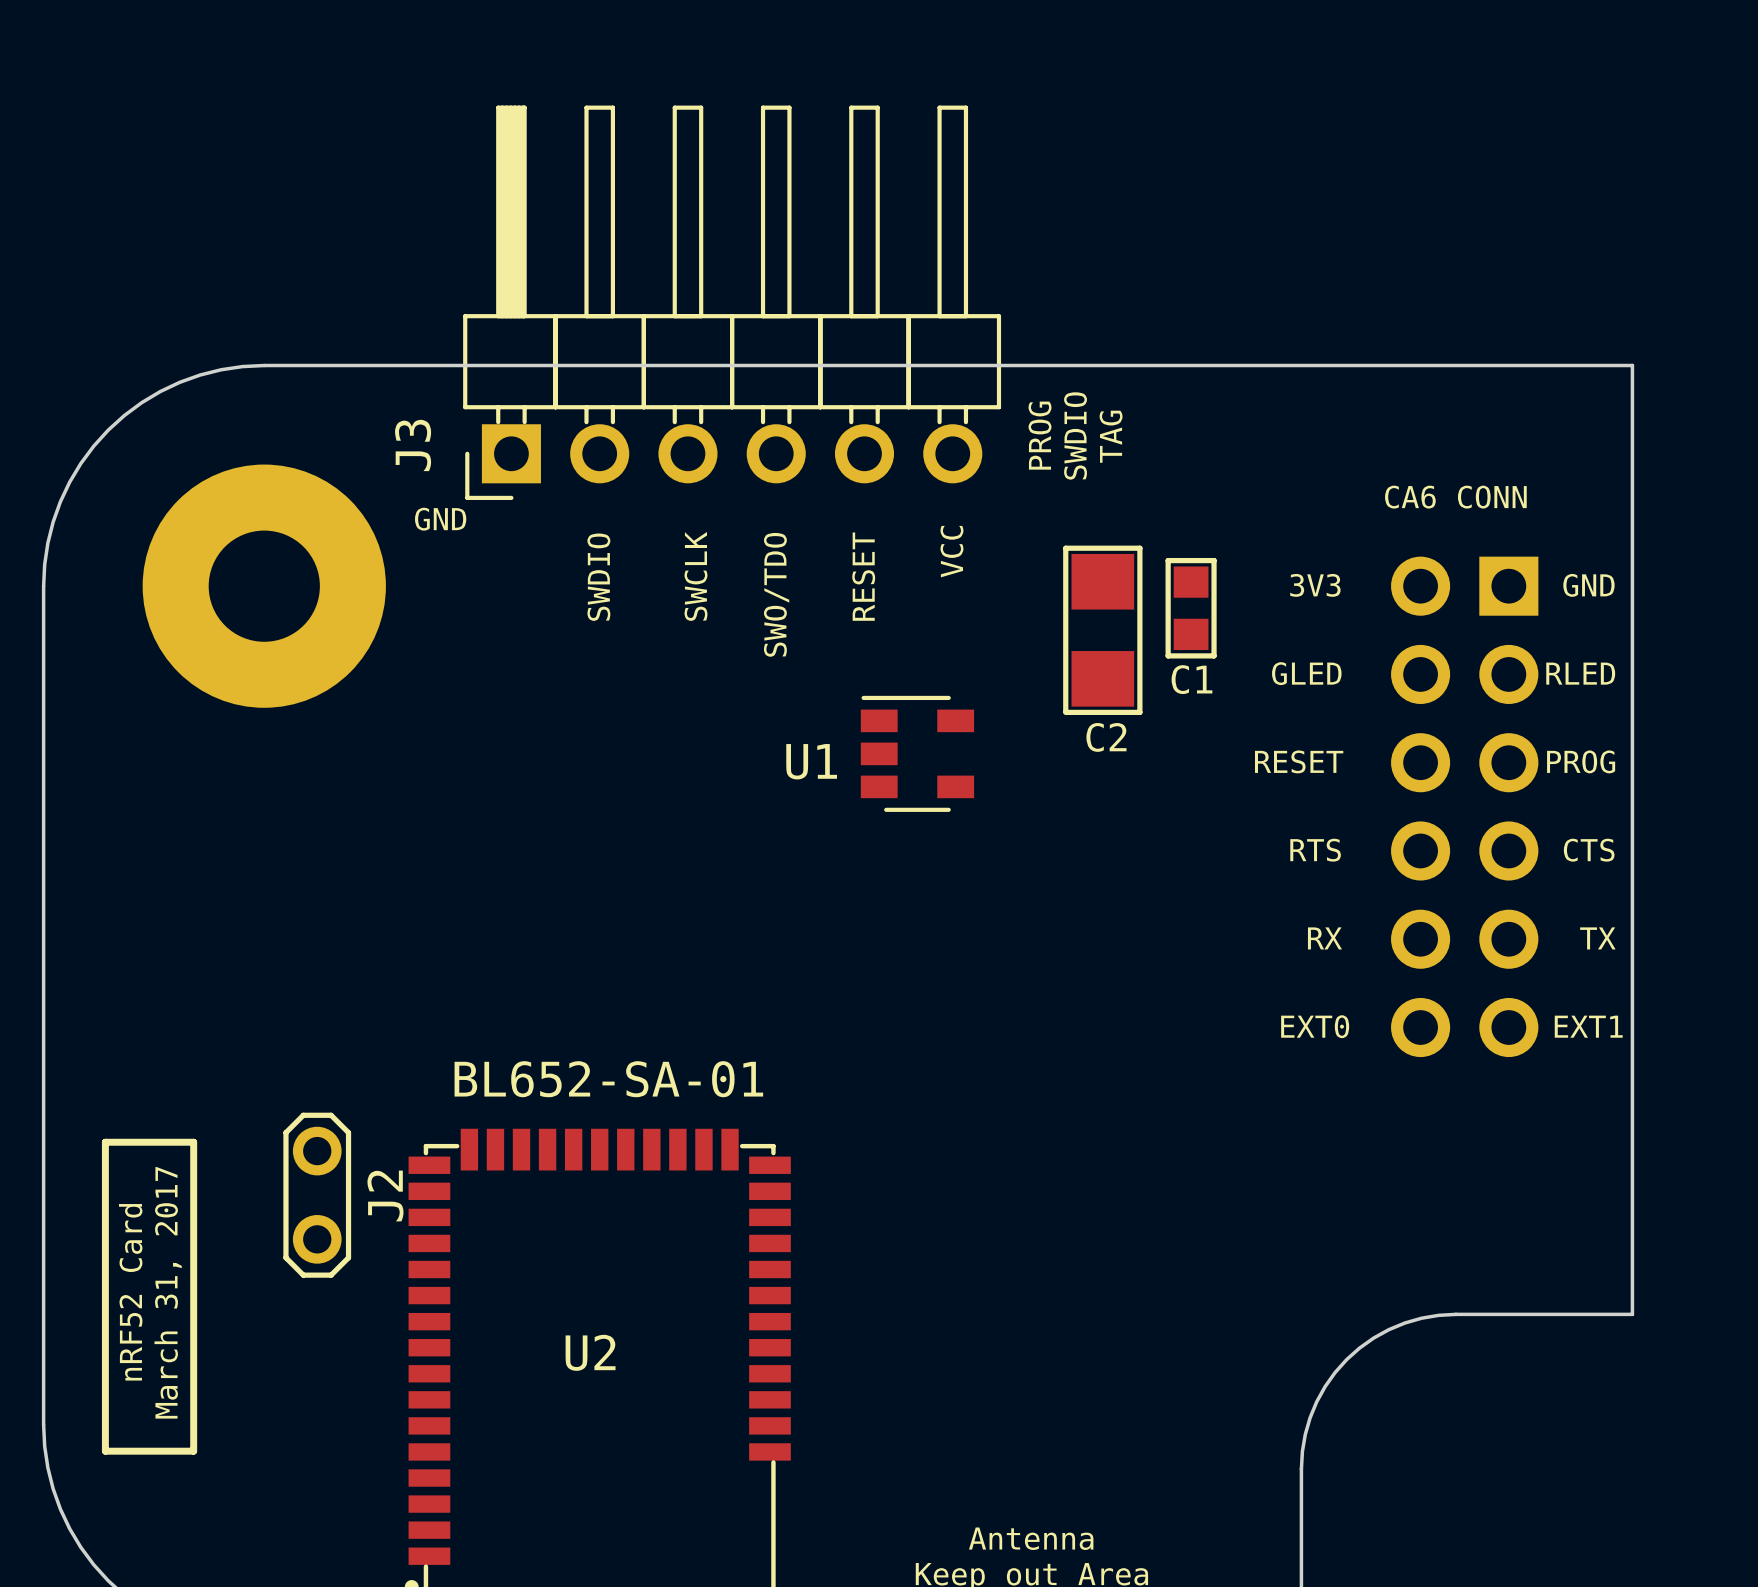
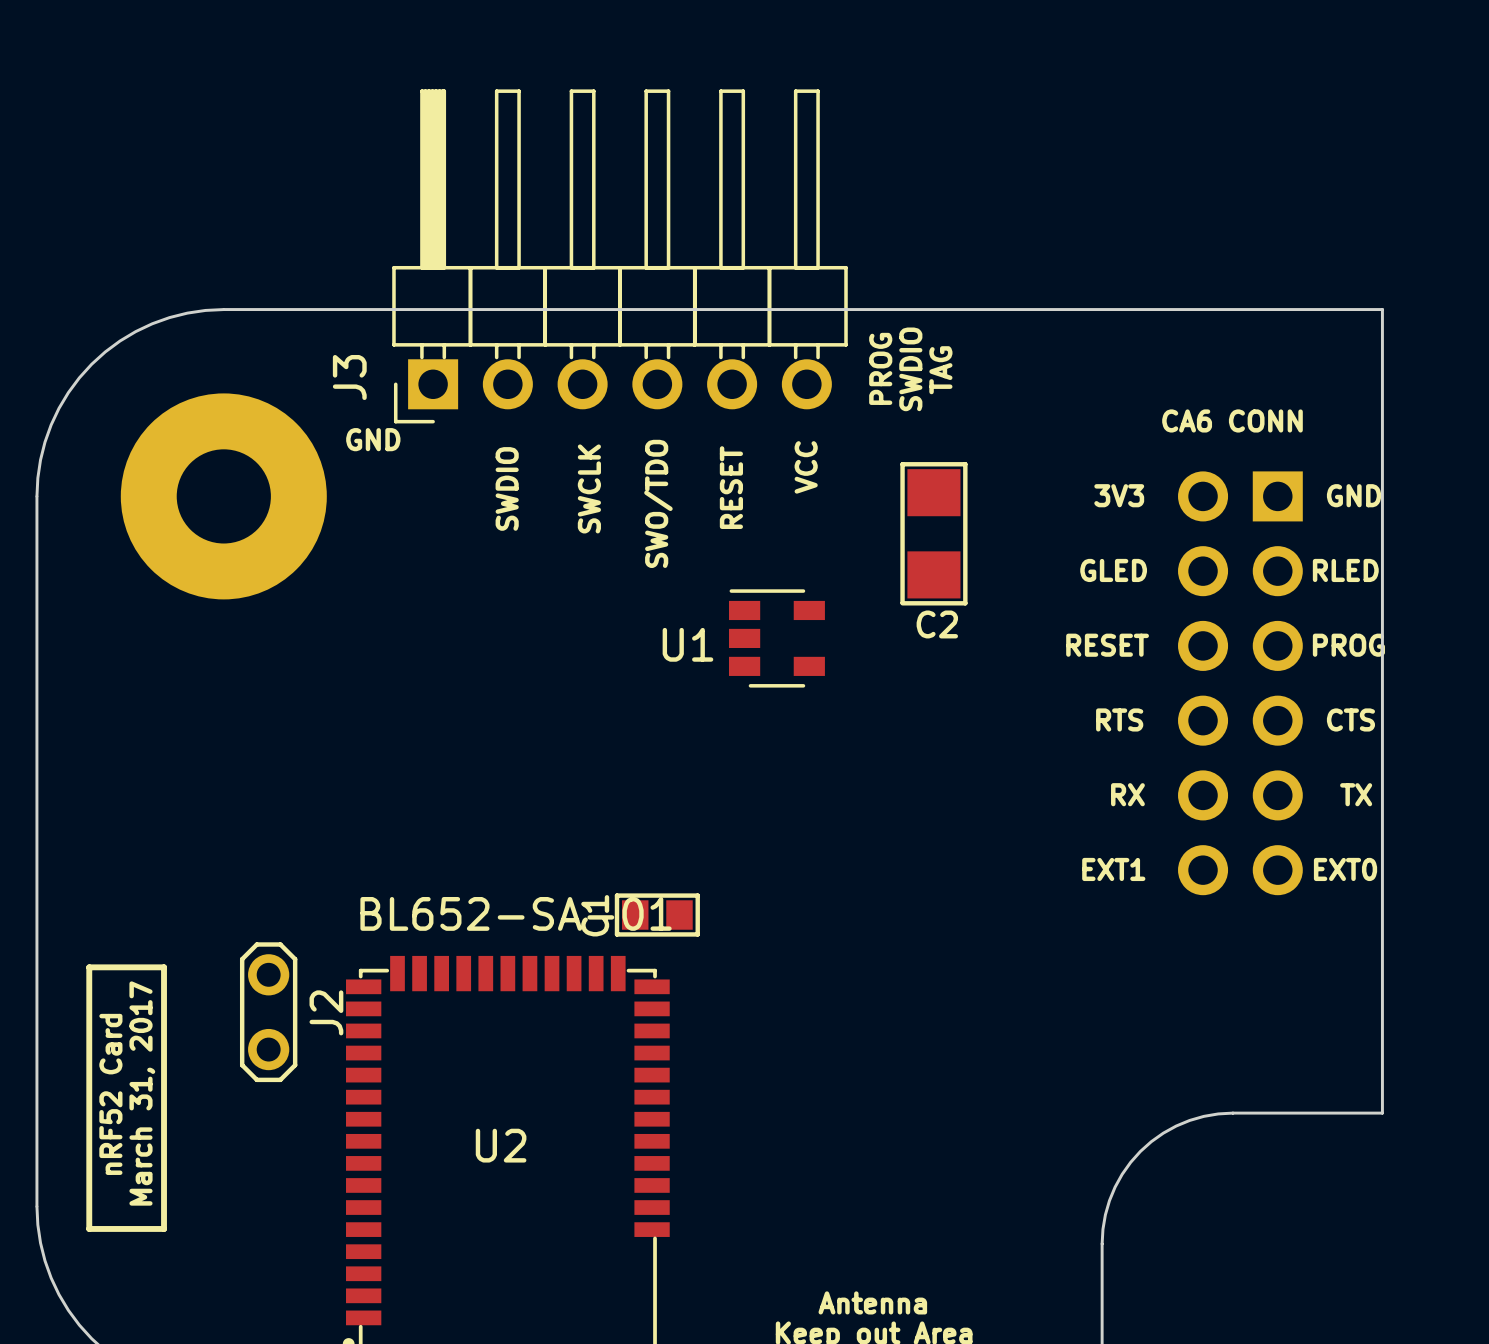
C1 rotation: 0° (1191, 608) -> 90° clockwise (657, 915)
C1 position: (1191, 608) -> (657, 915)
text: EXT0 (1315, 1026) -> EXT1 (1113, 869)
text: EXT1 (1588, 1026) -> EXT0 (1345, 869)

